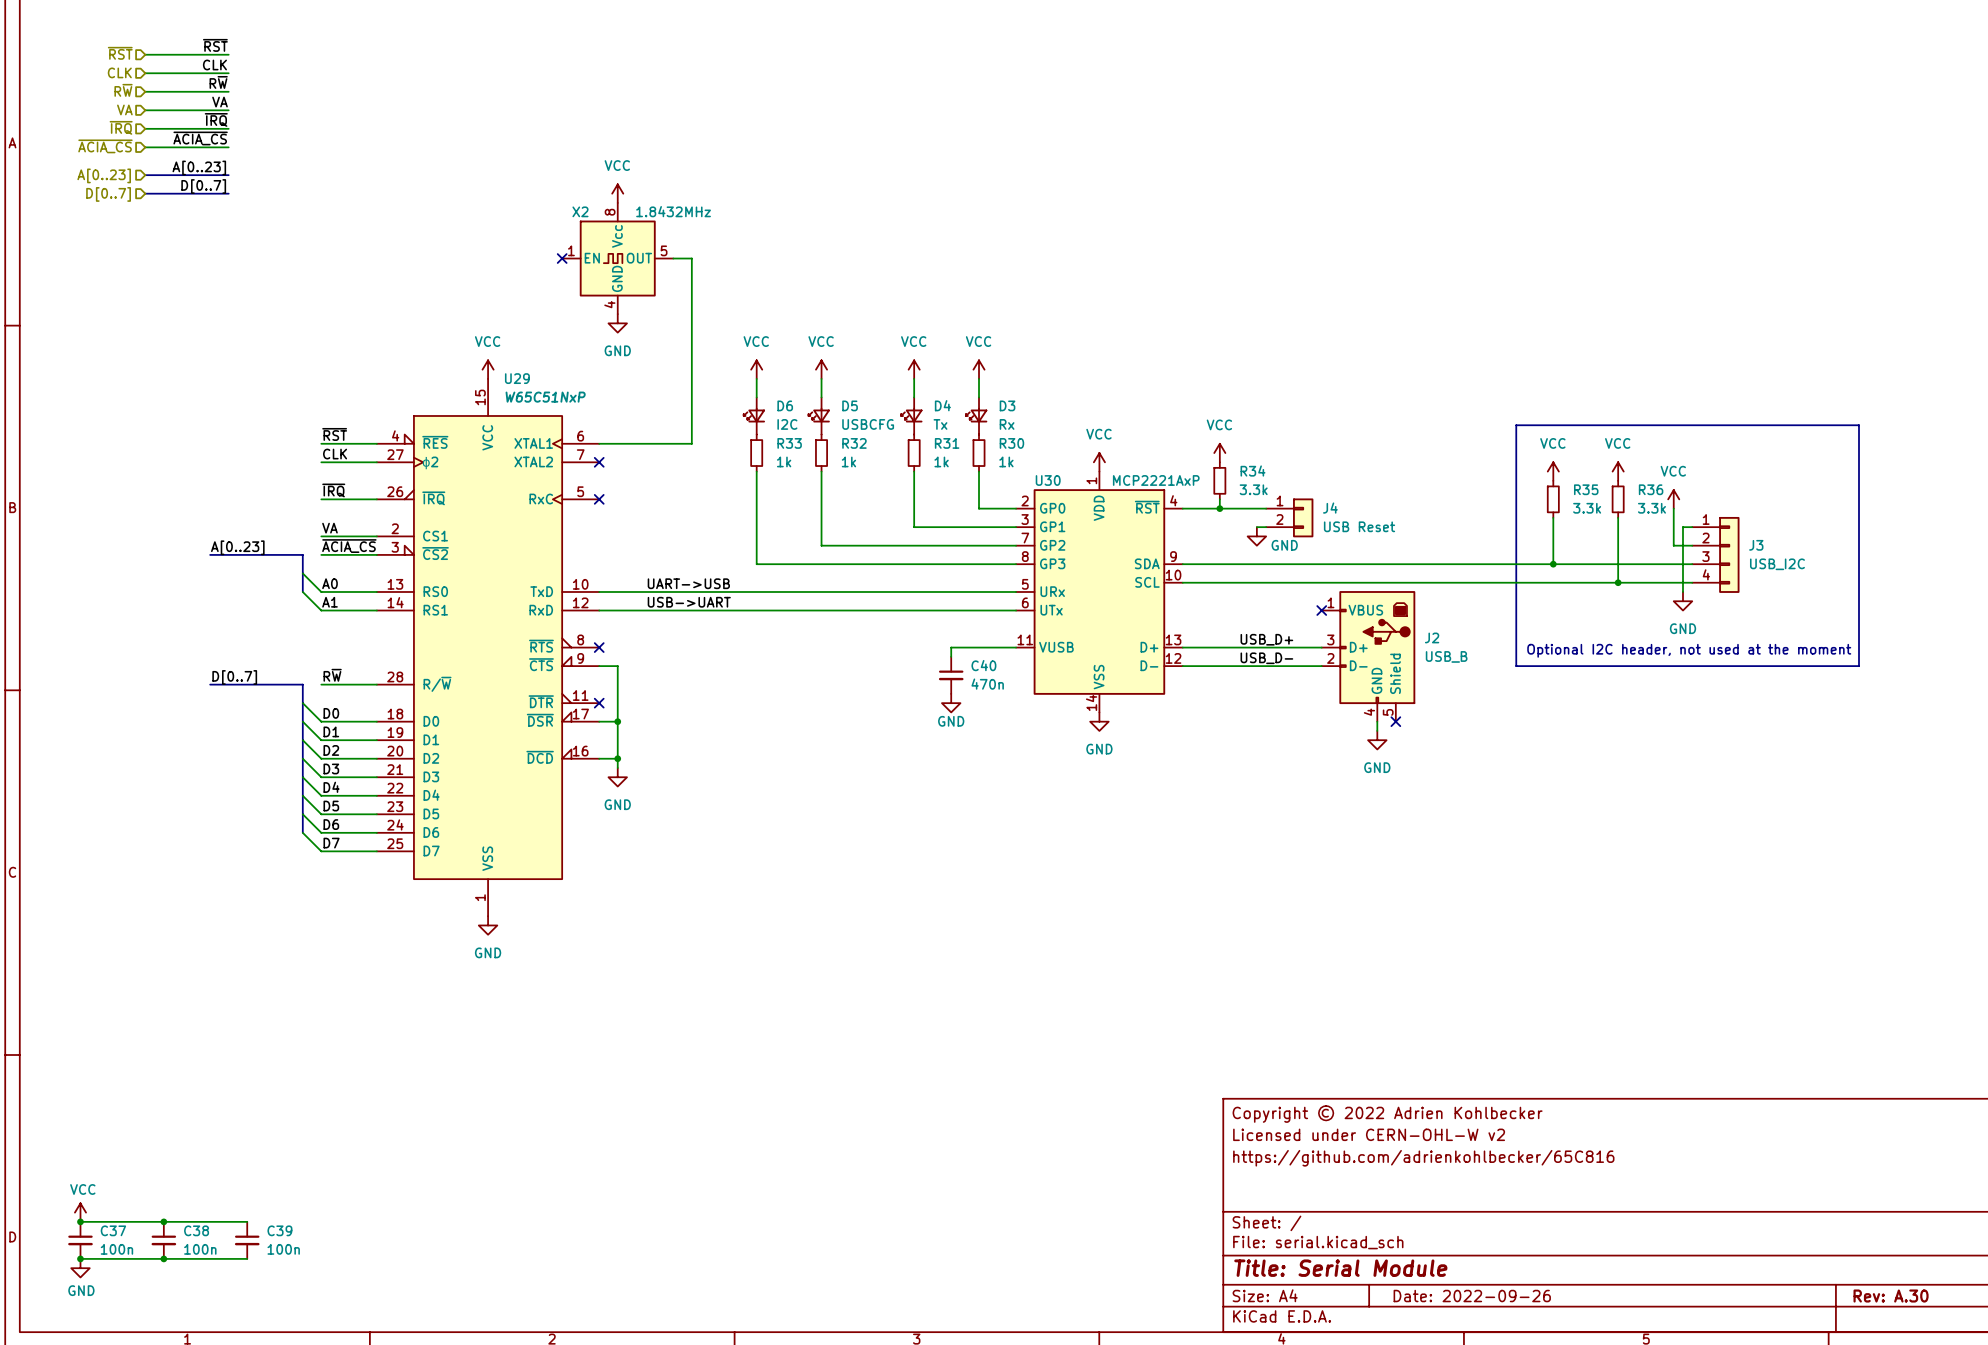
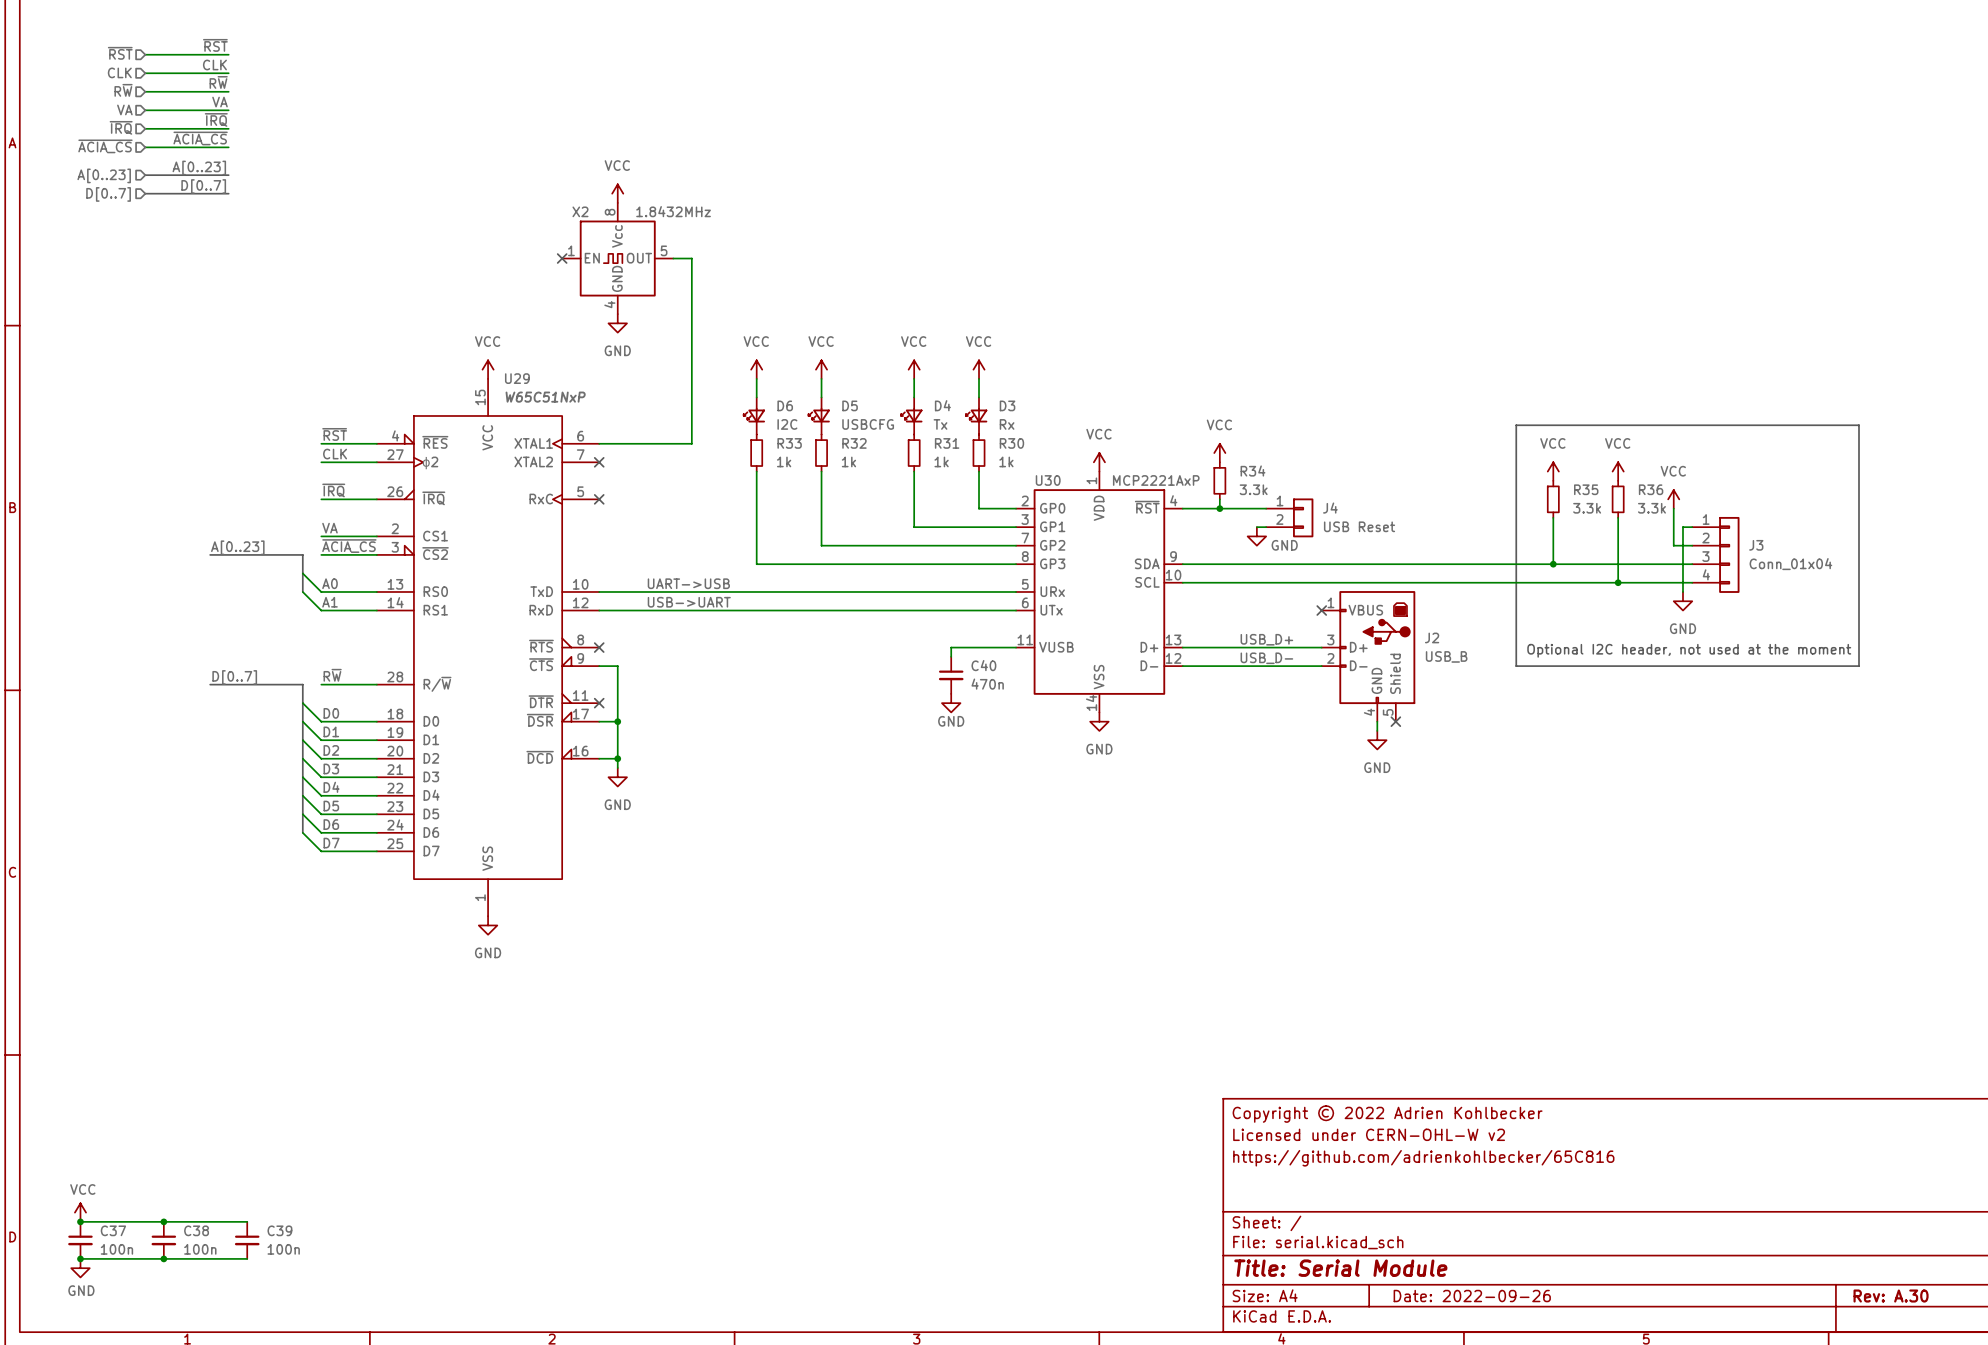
J3 value: USB_I2C (1777, 564) -> Conn_01x04 (1790, 564)

